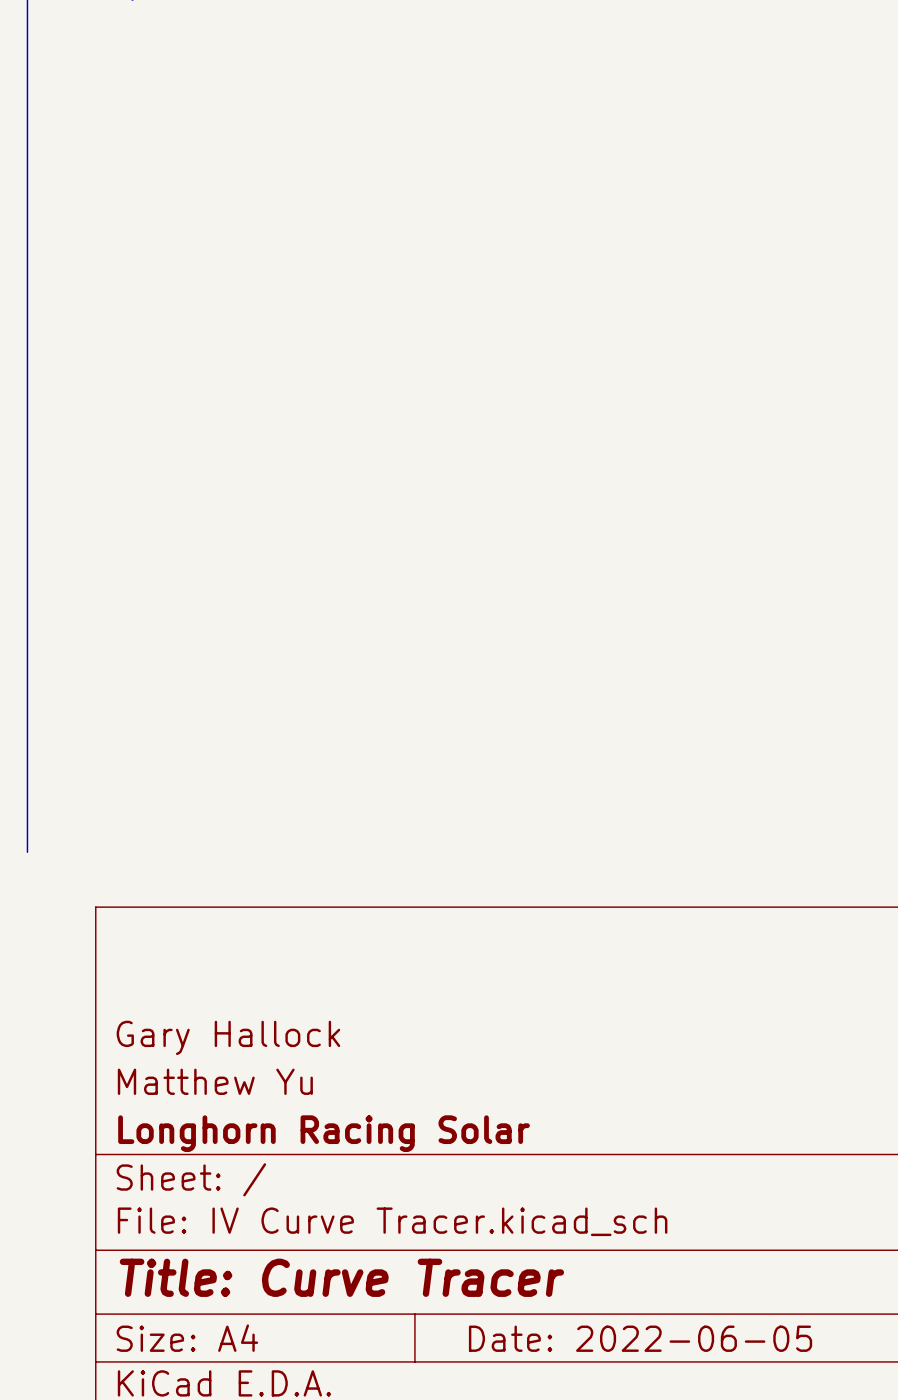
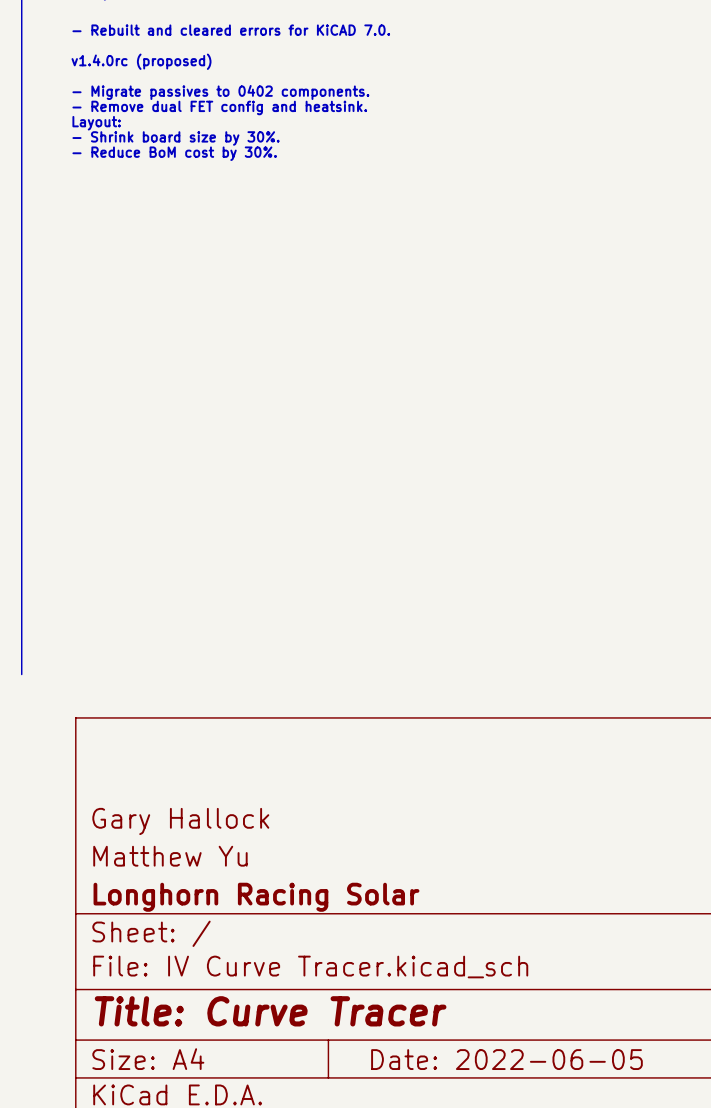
text: none -> - Rebuilt and cleared errors for KiCAD 7.0. (231, 30)
text: none -> v1.4.0rc (proposed) (141, 61)
text: none -> - Migrate passives to 0402 components. (220, 92)
text: none -> - Remove dual FET config and heatsink. (219, 107)
text: none -> Layout: (96, 123)
text: none -> - Shrink board size by 30%. (176, 138)
text: none -> - Reduce BoM cost by 30%. (174, 153)

